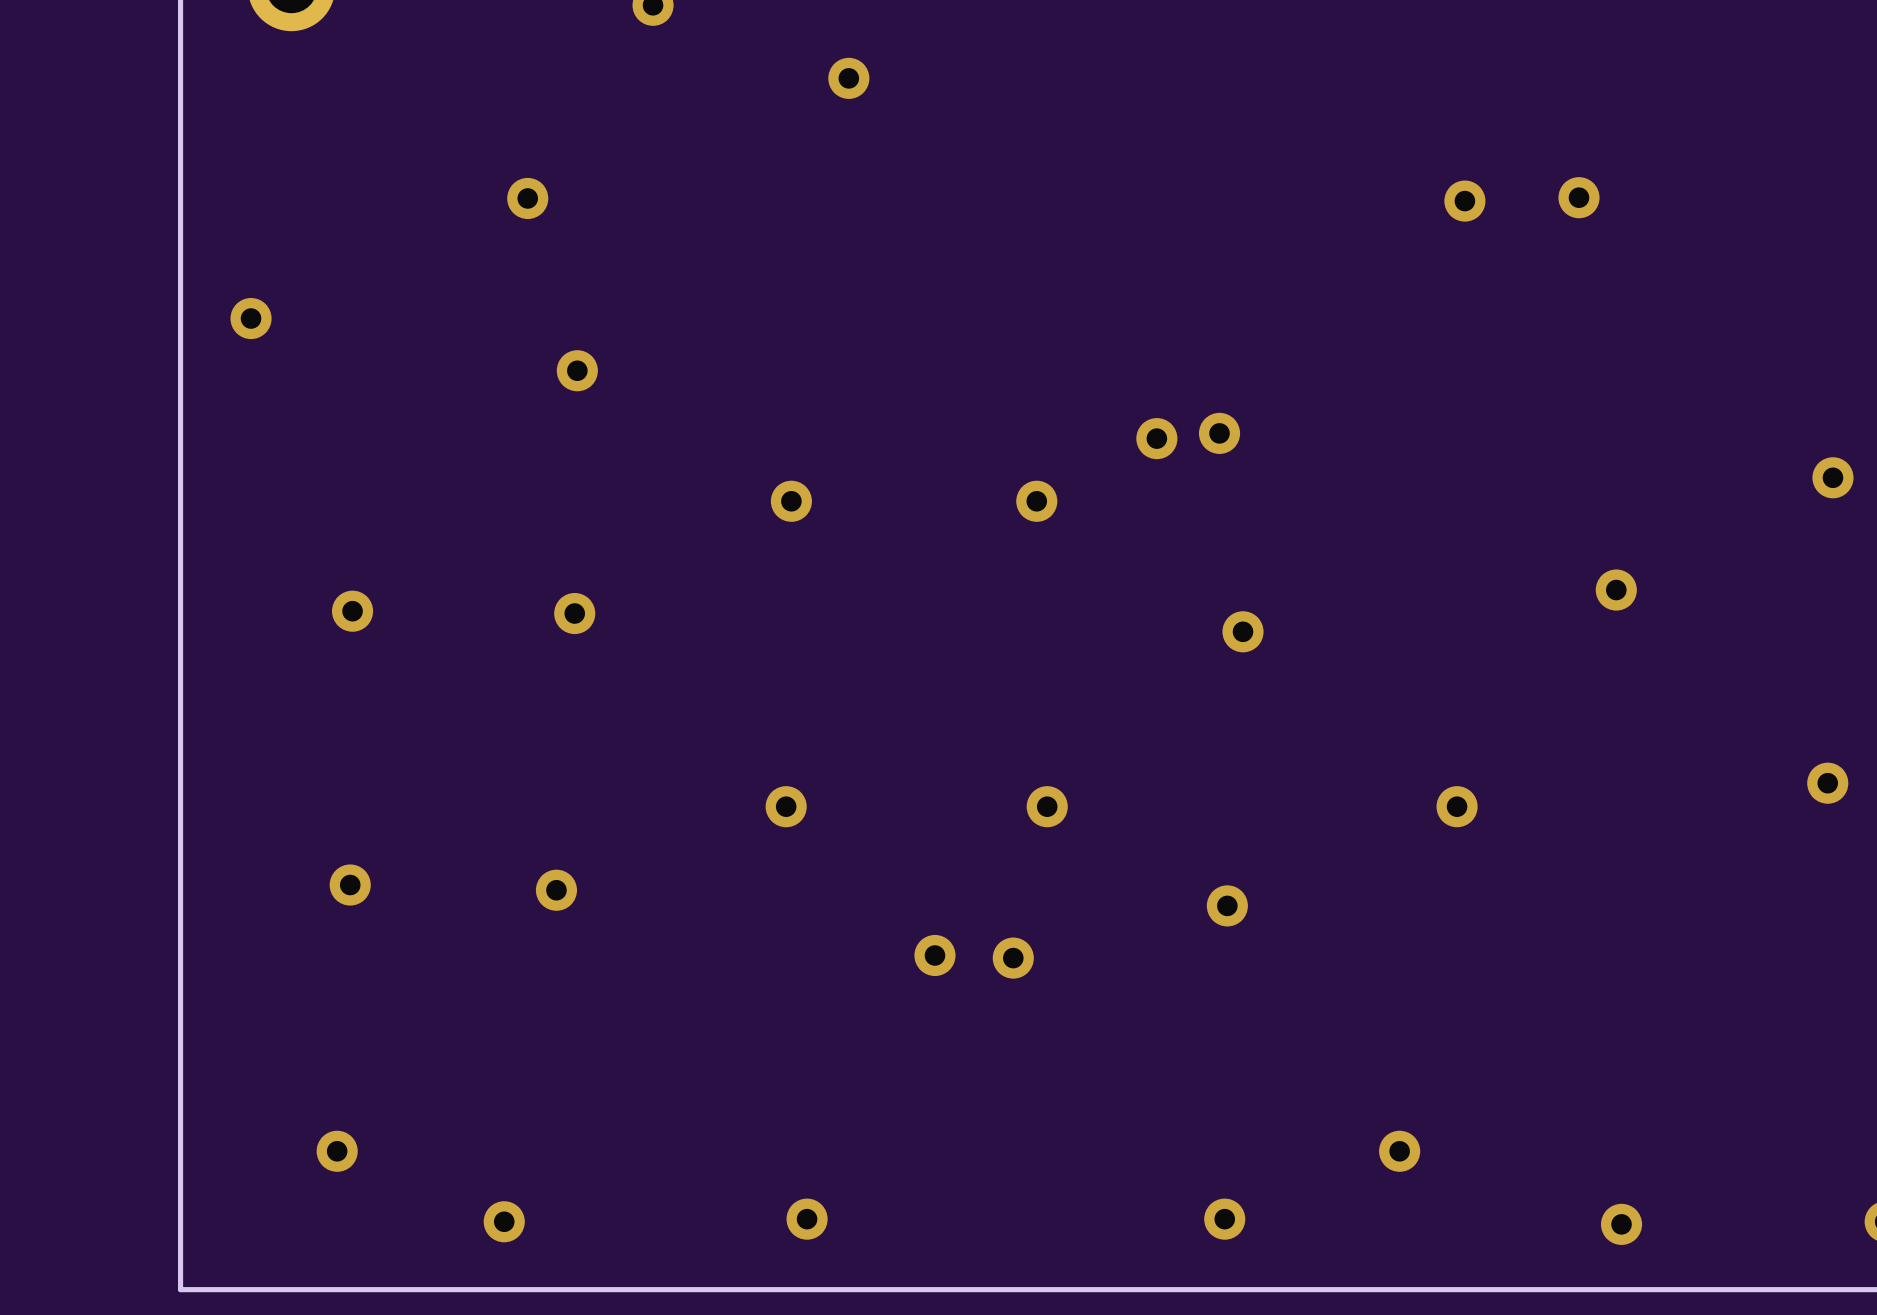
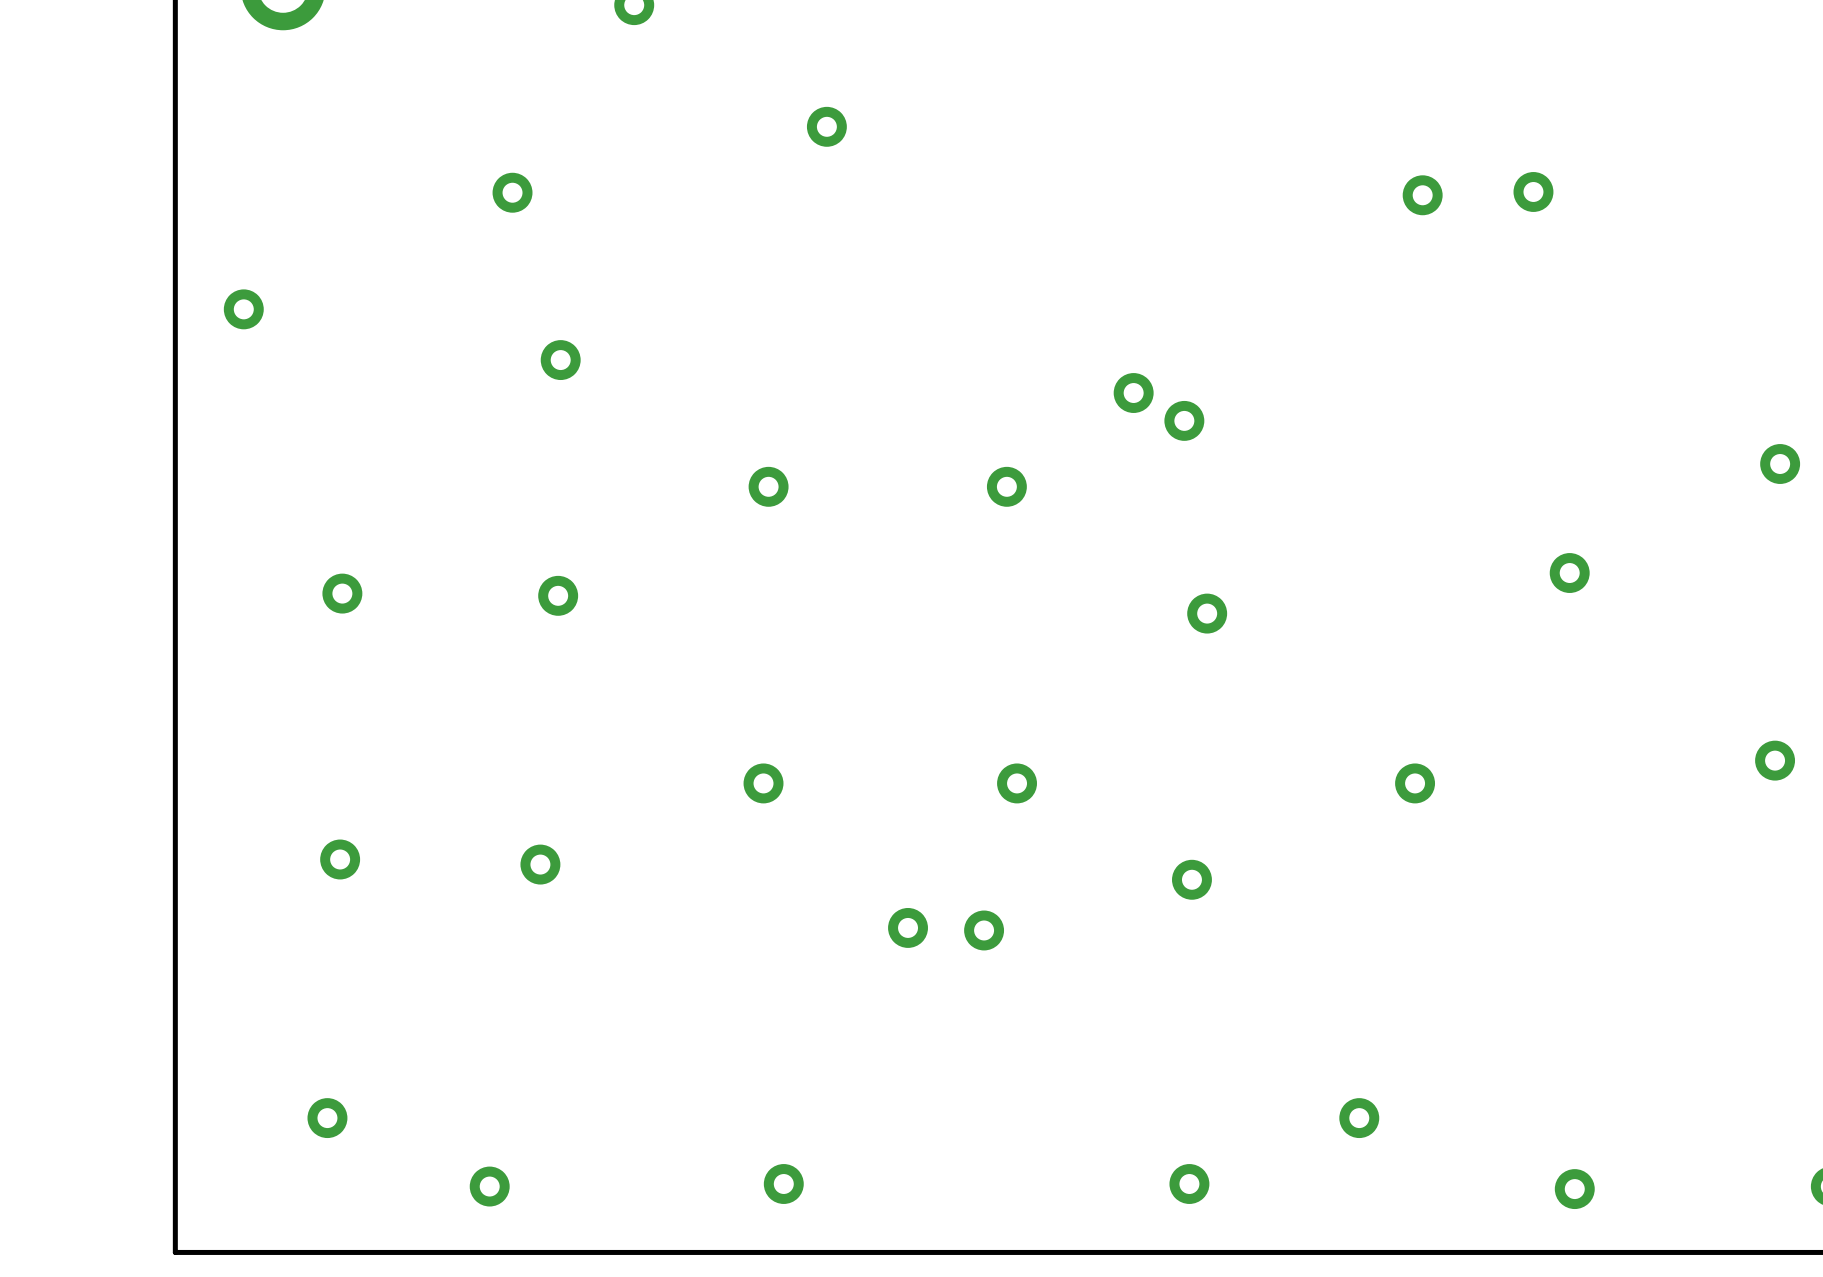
via position: (848, 78) -> (826, 126)
via position: (1156, 438) -> (1133, 393)

